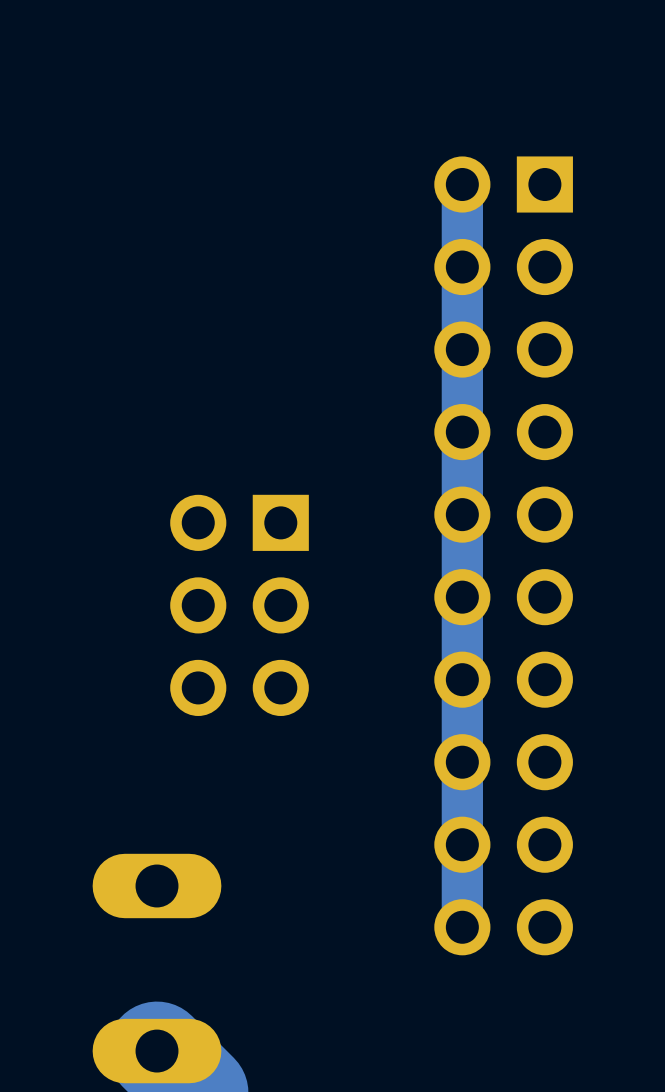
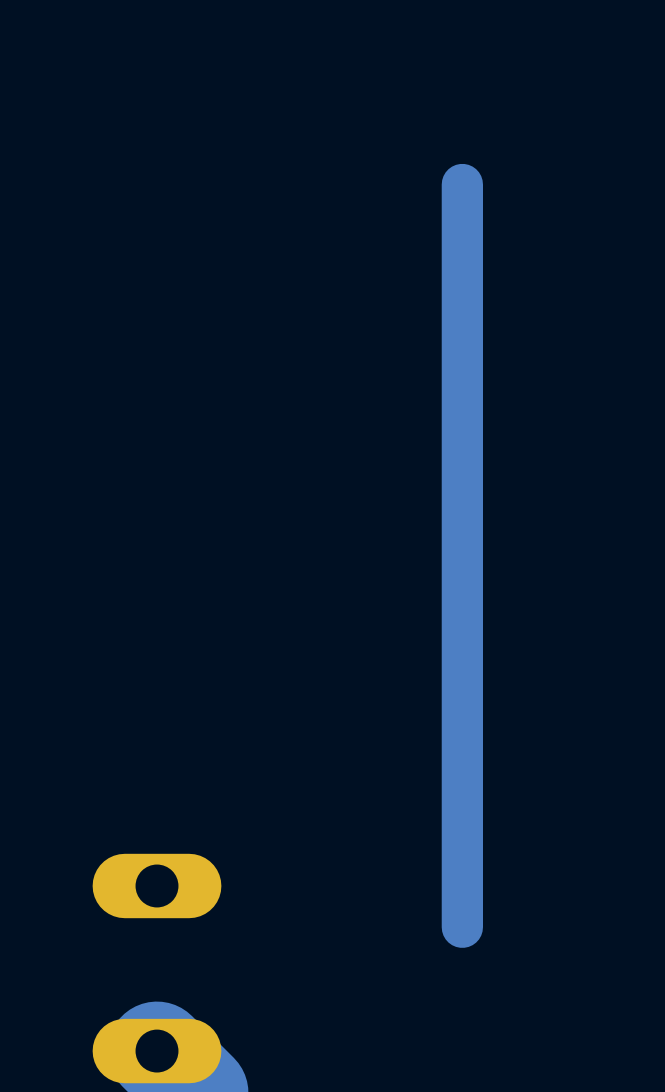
part: (503, 555) -> none
part: (239, 605) -> none

